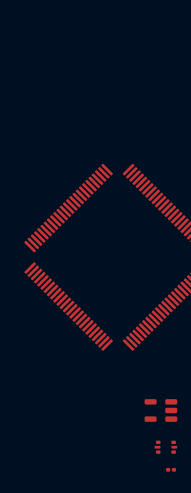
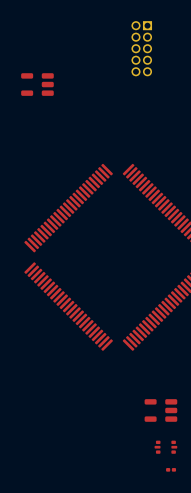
part: none -> (141, 48)
part: none -> (37, 84)

